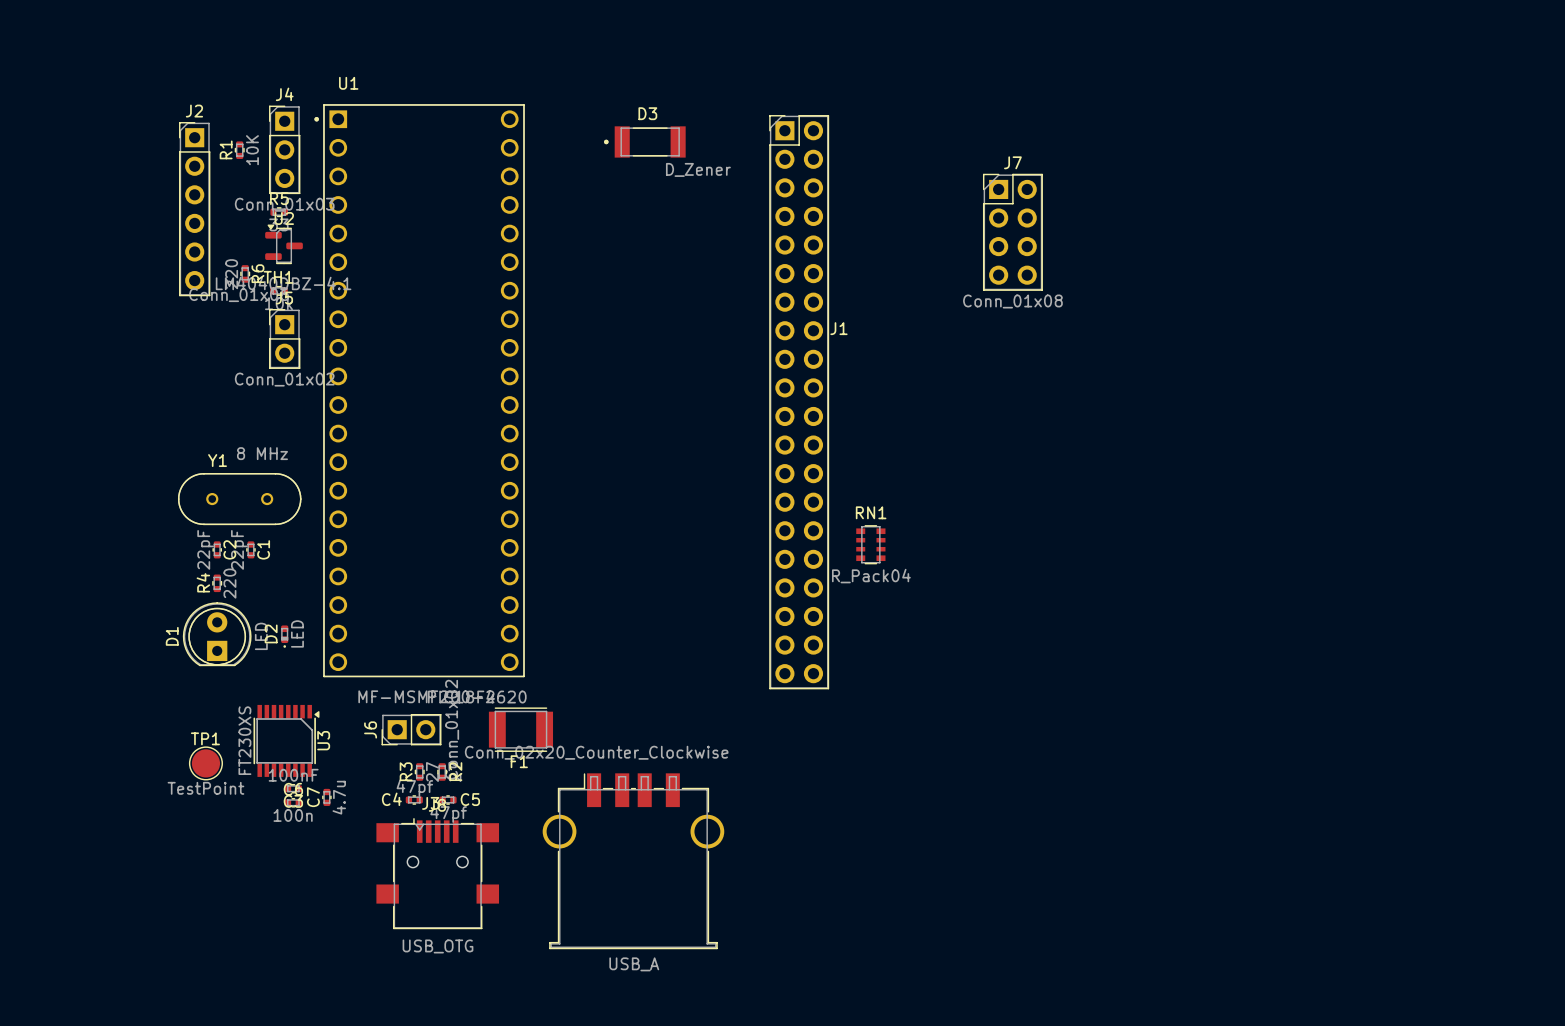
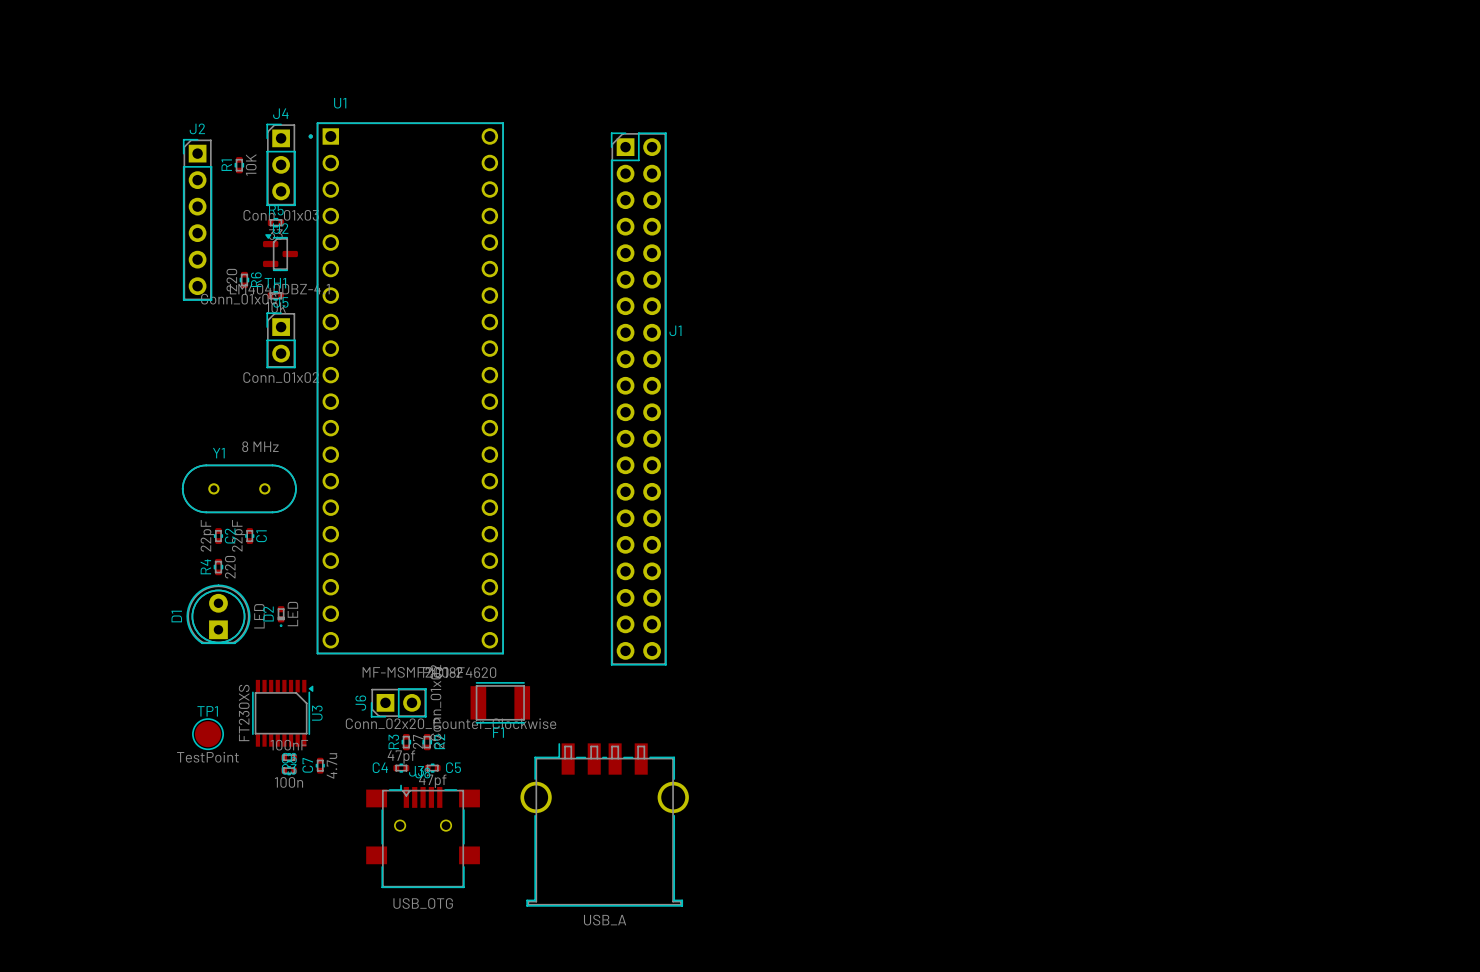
D3: D_Zener (644, 141) -> none
J7: Conn_01x08 (1012, 232) -> none
J1 position: (799, 402) -> (638, 399)
RN1: R_Pack04 (870, 544) -> none

